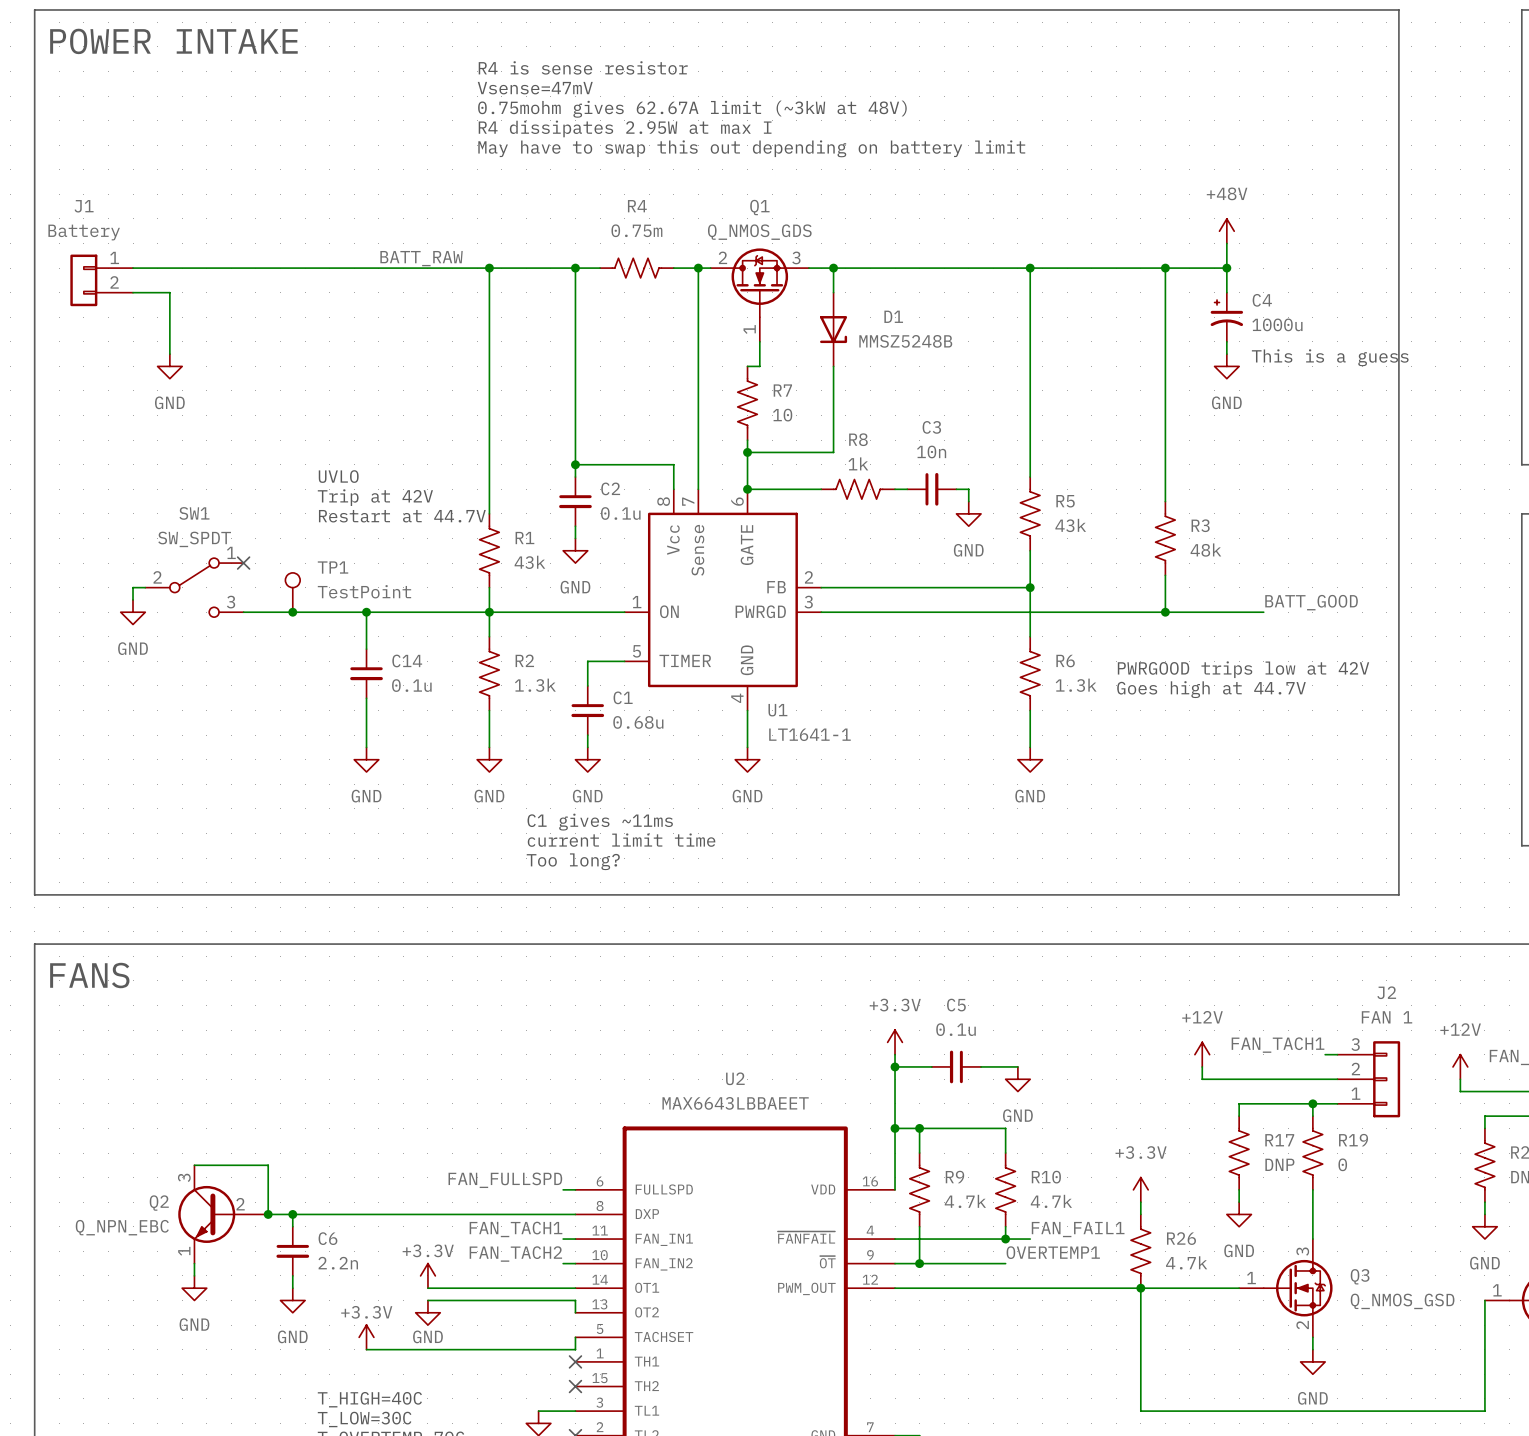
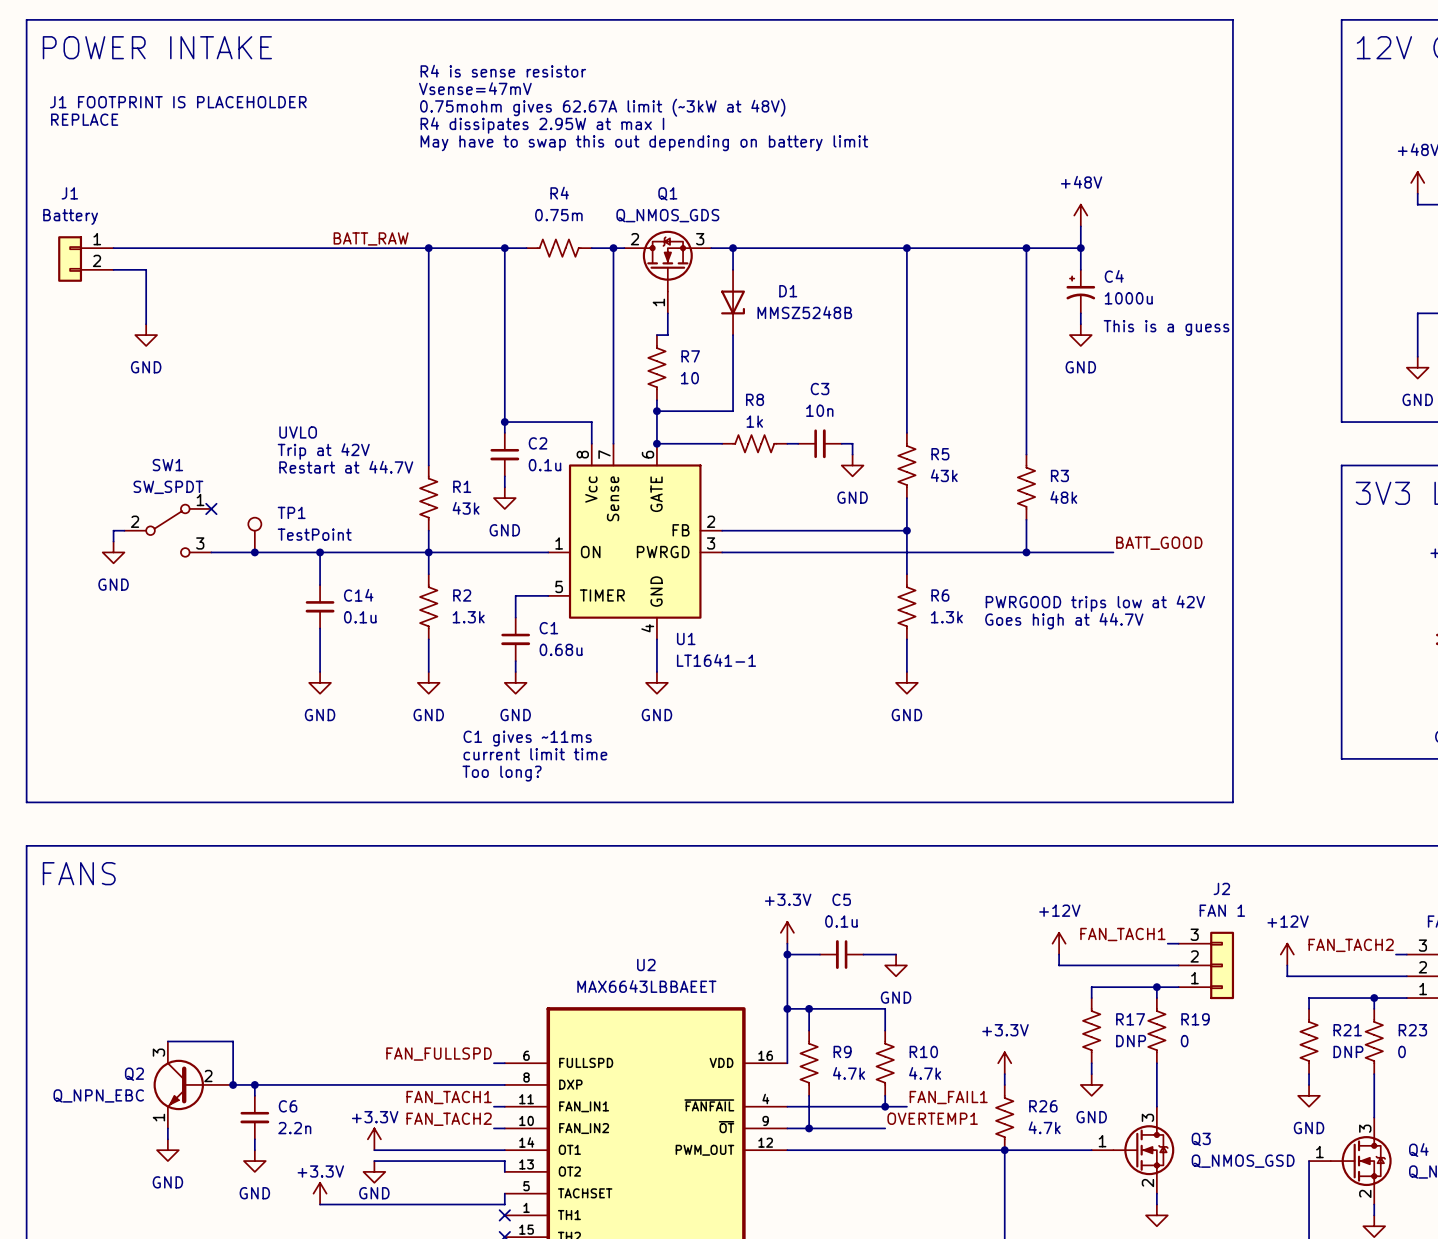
text: none -> J1 FOOTPRINT IS PLACEHOLDER (178, 102)
text: none -> REPLACE (84, 119)

